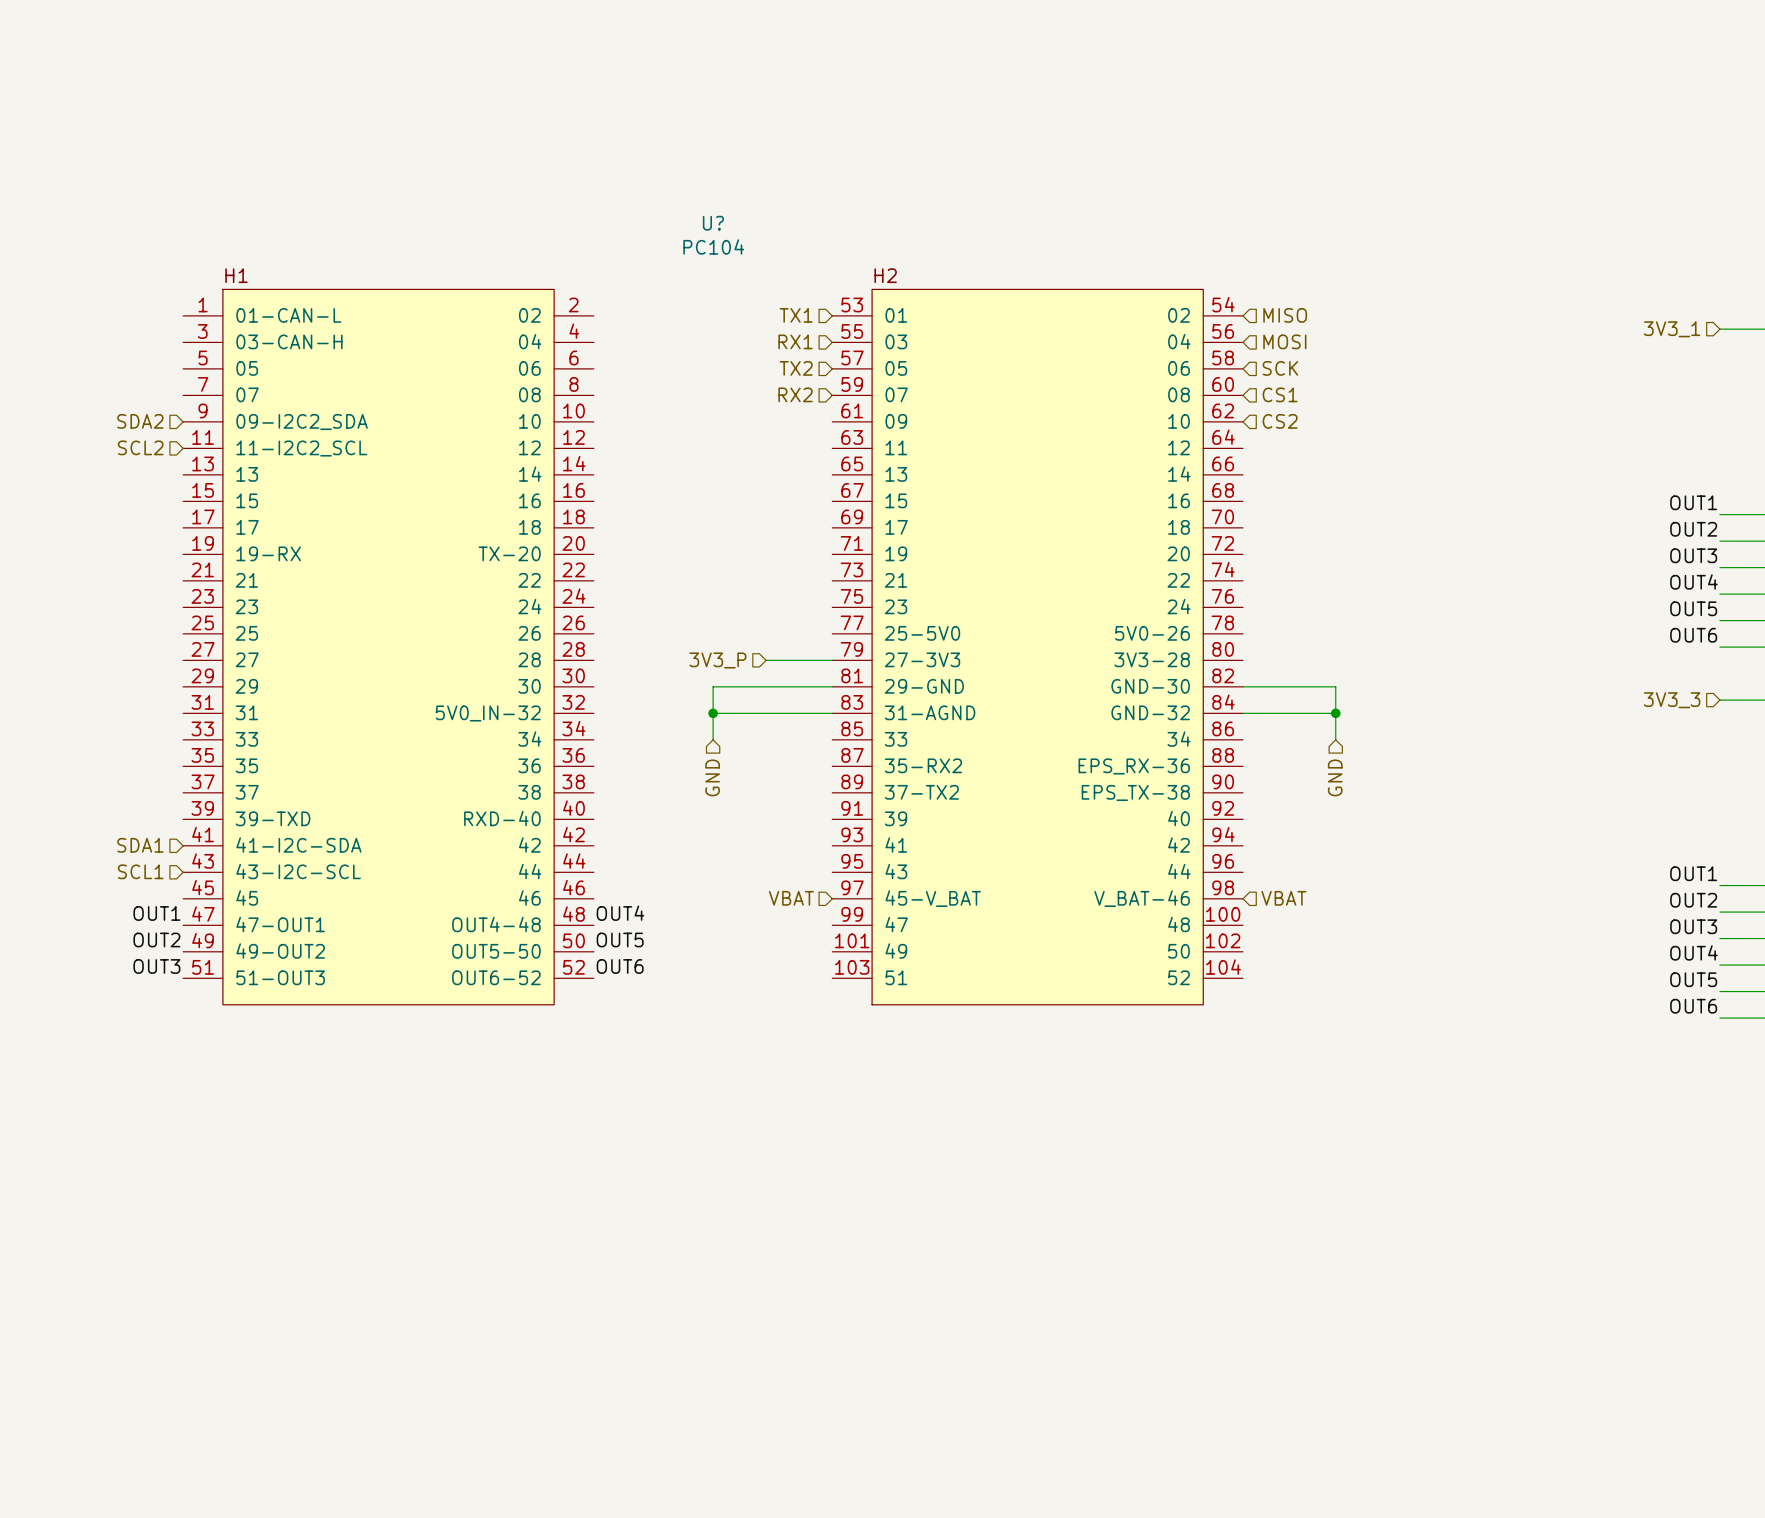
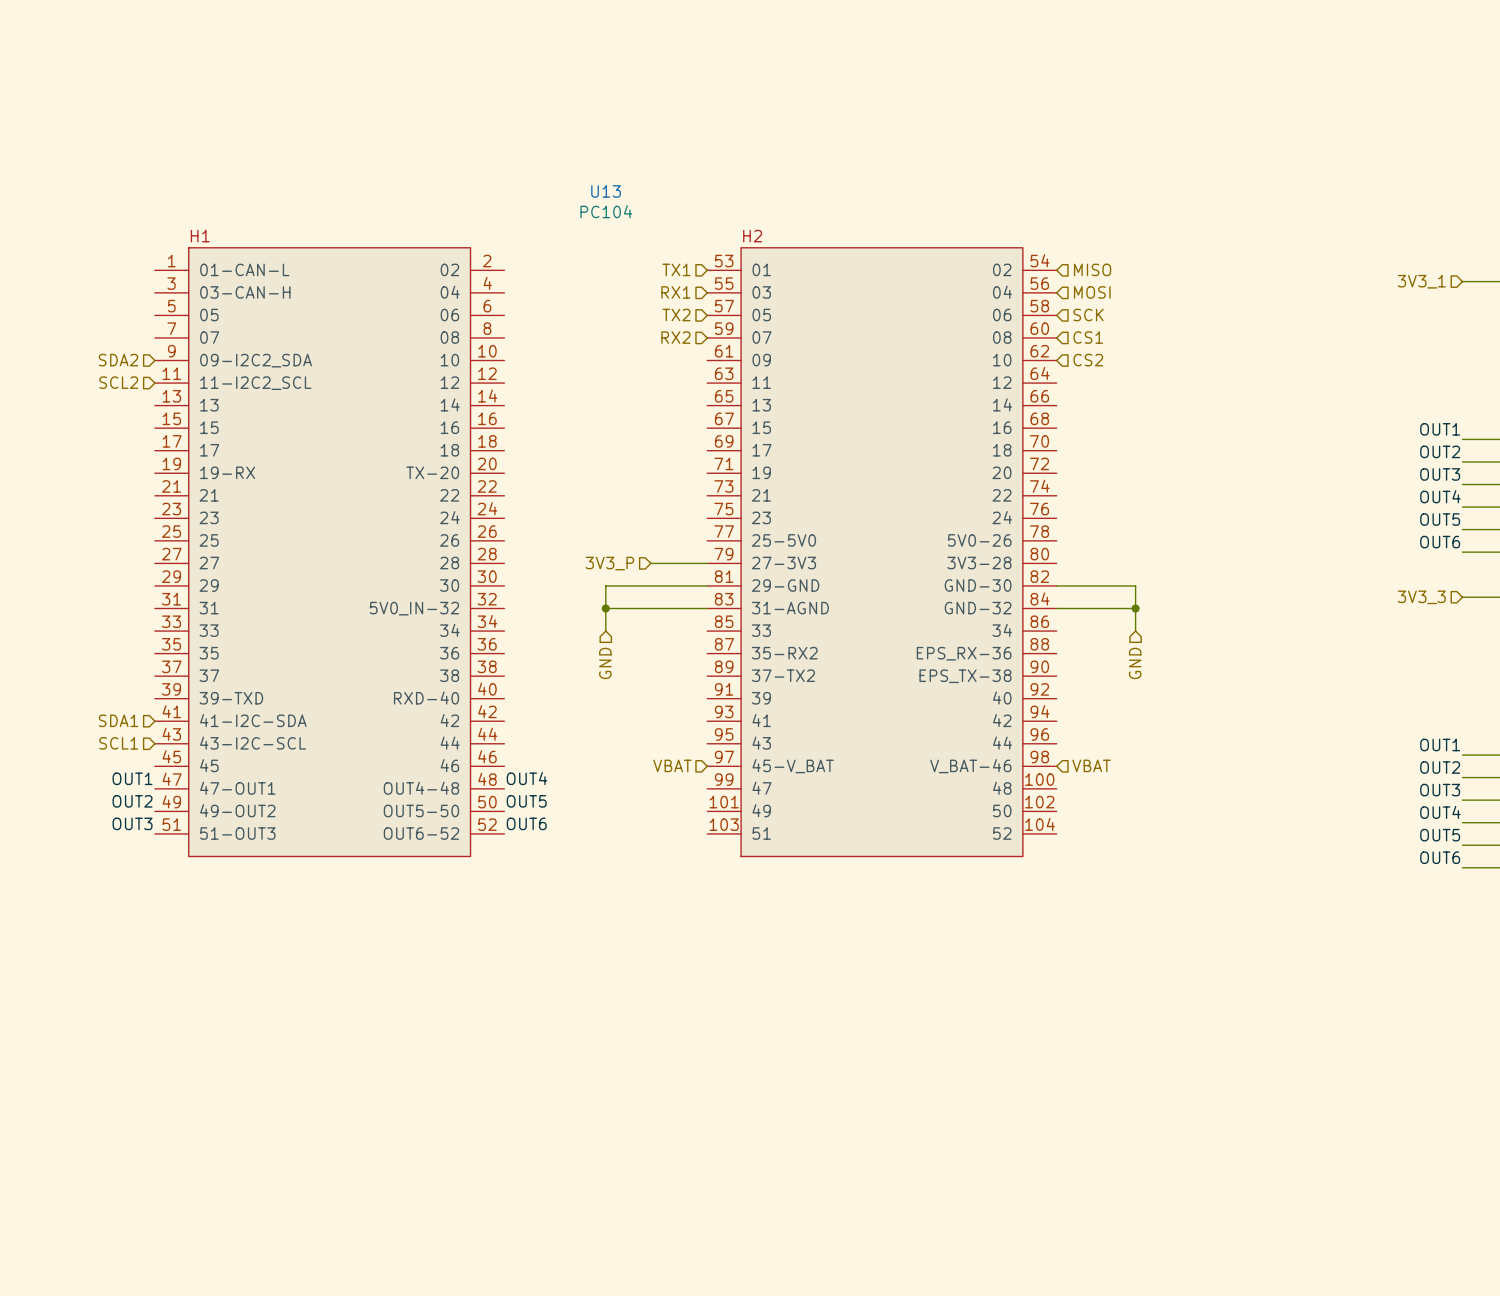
U? name: U? (713, 223) -> U13 (606, 191)

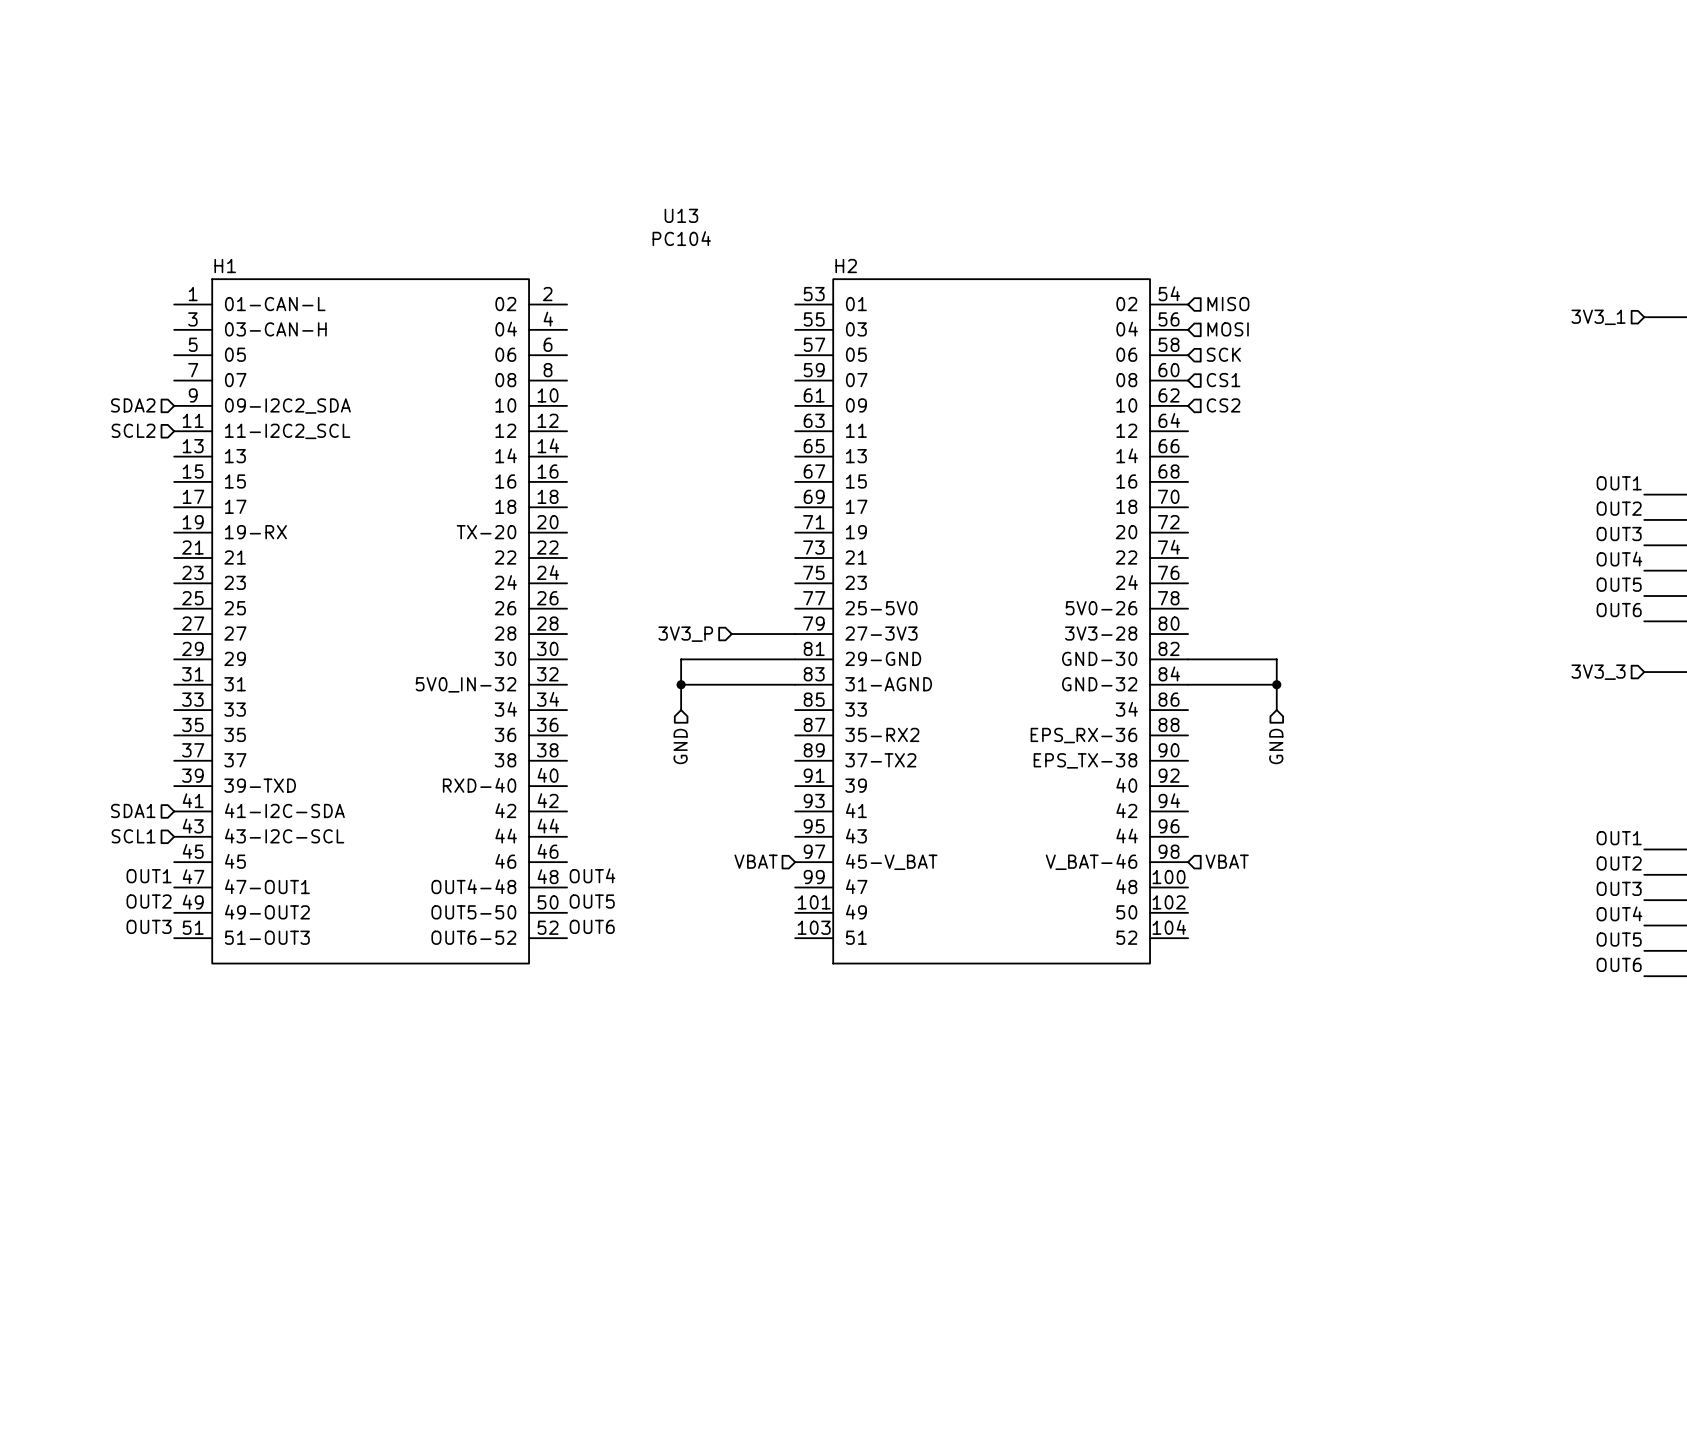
hierarchical label: TX1 (676, 269) -> none
hierarchical label: RX1 (675, 292) -> none
hierarchical label: TX2 (676, 315) -> none
hierarchical label: RX2 (675, 337) -> none

